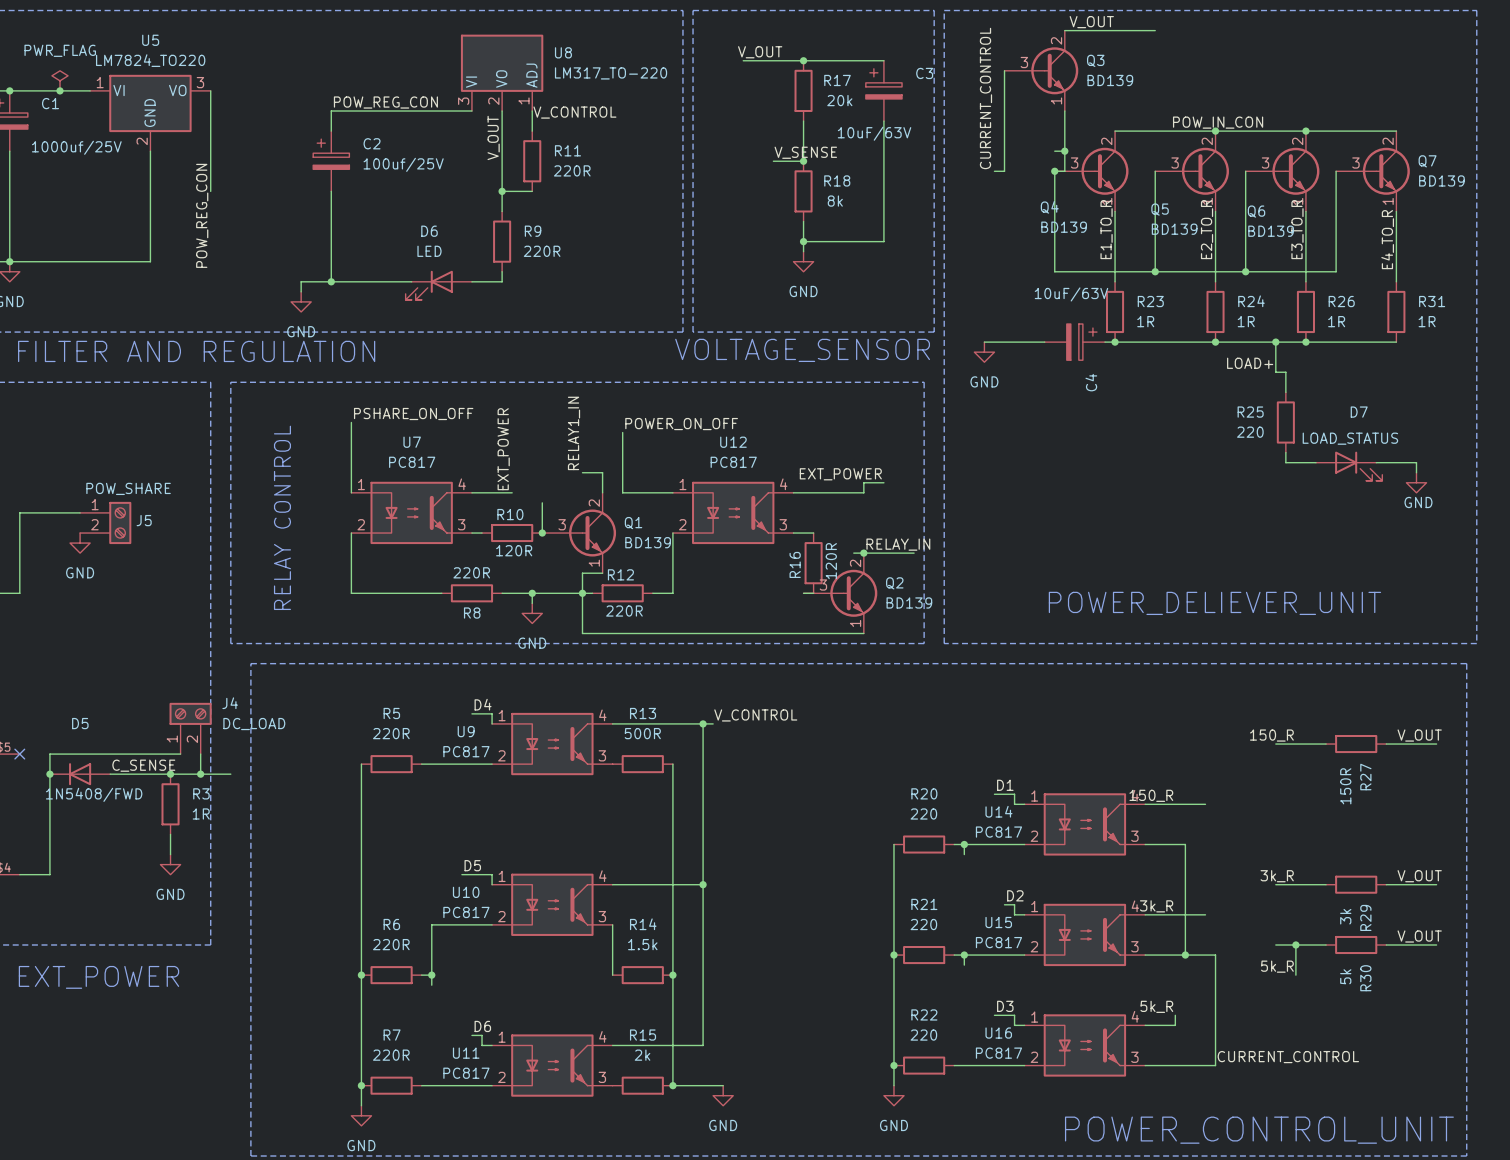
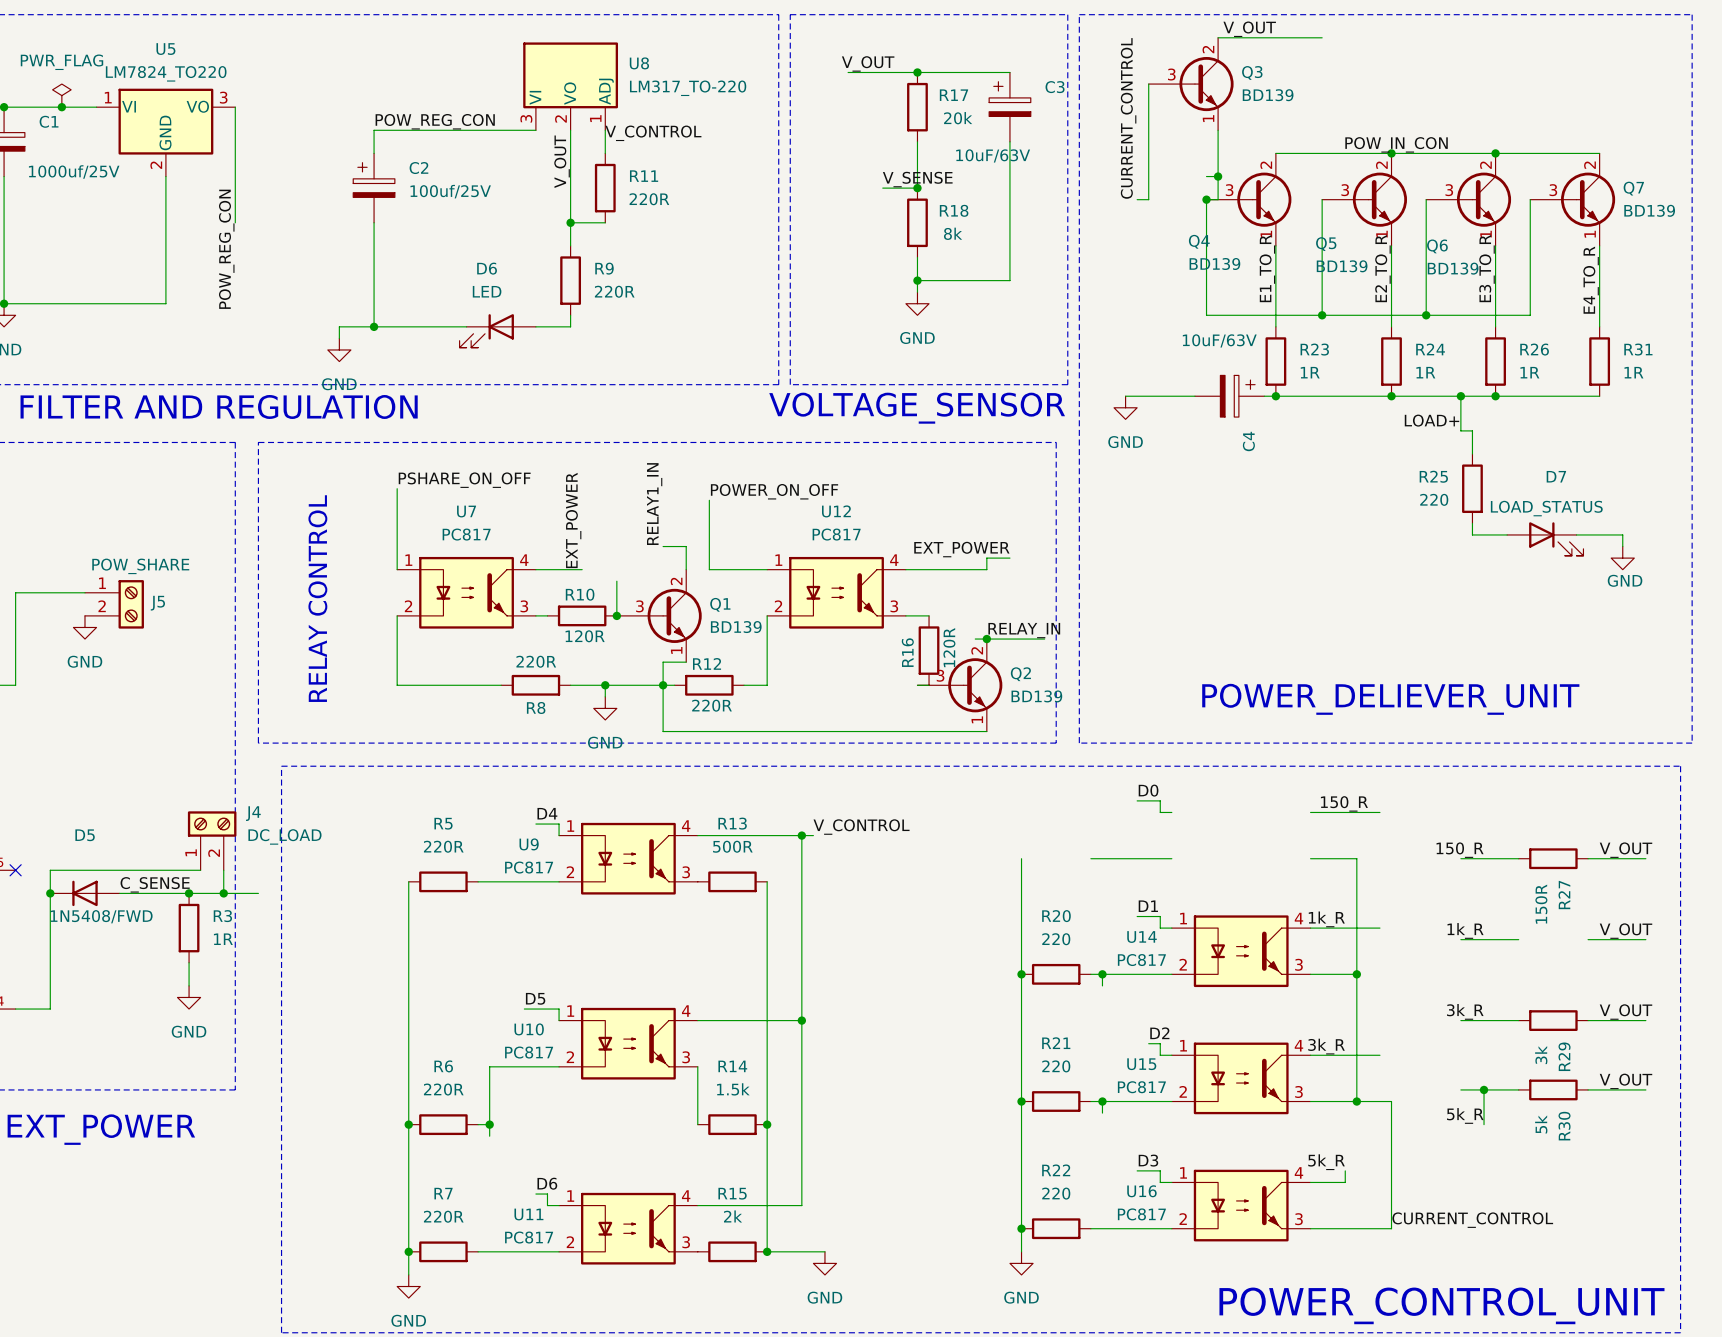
label: none -> D0 (1148, 790)
wire: none -> (1137, 800) (1160, 800) (1160, 812) (1171, 812)
label: none -> 150_R (1344, 803)
wire: none -> (1310, 812) (1379, 812)
wire: none -> (1021, 858) (1021, 974)
wire: none -> (1090, 858) (1171, 858)
wire: none -> (1310, 858) (1356, 858) (1356, 974)
label: 150_R (1151, 795) -> 1k_R (1326, 919)
label: none -> 1k_R (1465, 930)
label: none -> V_OUT (1625, 931)
wire: none -> (1460, 939) (1518, 939)
wire: none -> (1588, 939) (1645, 939)
junction: none -> (1021, 974)
junction: none -> (1356, 974)

